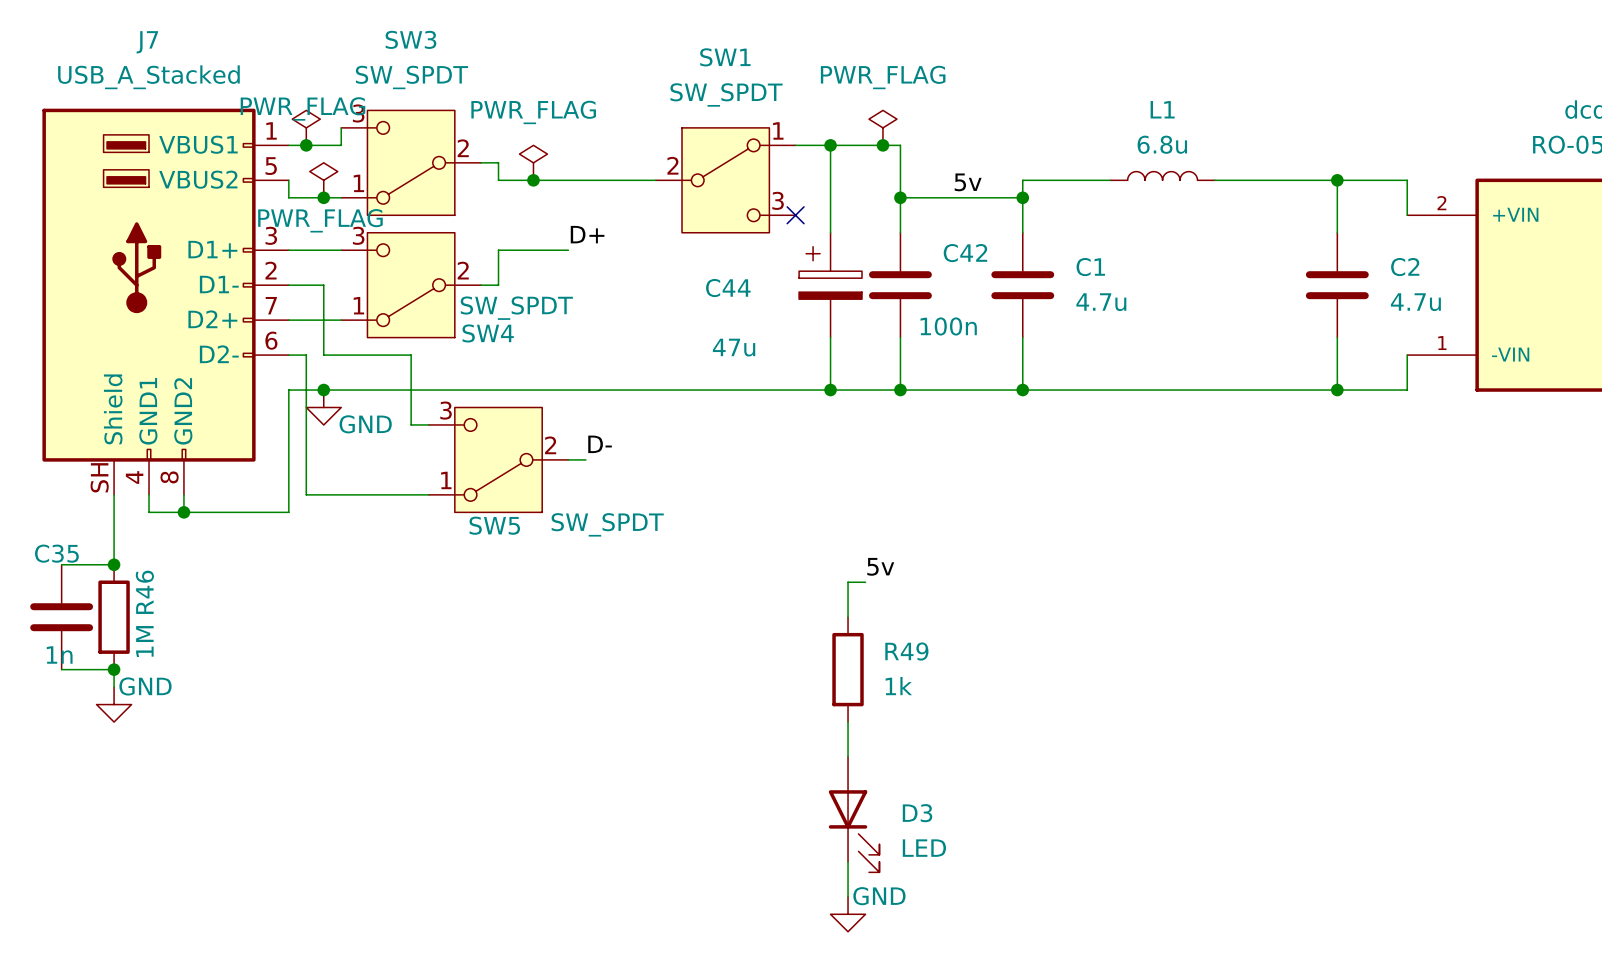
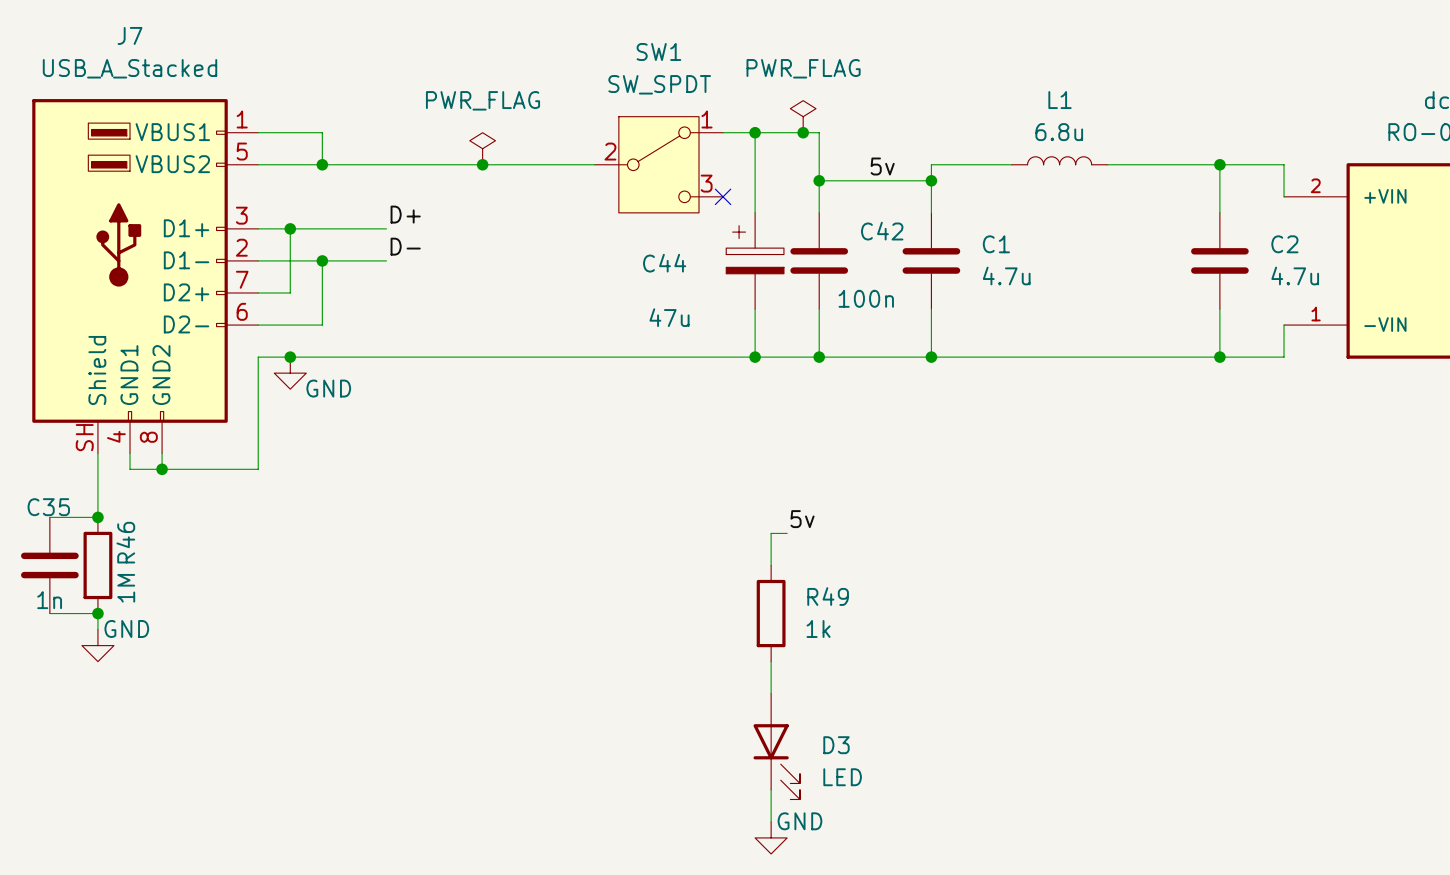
power symbol: PWR_FLAG (306, 127) -> none
wire: (341, 127) (341, 145) -> (322, 164) (322, 132) (306, 132)
junction: (306, 145) -> none
SW3: SW_SPDT (411, 162) -> none
wire: (481, 162) (498, 162) (498, 180) -> none
wire: (288, 180) (288, 197) (341, 197) -> (258, 164) (450, 164)
power symbol: PWR_FLAG (323, 180) -> none
junction: none -> (322, 164)
junction: (323, 197) -> none
label position: D+ (587, 234) -> D+ (405, 214)
wire: none -> (290, 228) (290, 260) (386, 260)
junction: none -> (290, 228)
wire: (568, 250) (498, 250) (498, 285) (481, 285) -> none
junction: none -> (322, 260)
SW4: SW_SPDT (411, 285) -> none
wire: (341, 320) (323, 320) (323, 355) -> (274, 325) (290, 325)
wire: (306, 355) (306, 494) (428, 494) -> none
wire: (358, 355) (411, 355) (411, 424) (428, 424) -> (322, 325) (322, 260)
label position: D- (600, 444) -> D- (405, 246)
SW5: SW_SPDT (498, 459) -> none
wire: (568, 459) (585, 459) -> none

